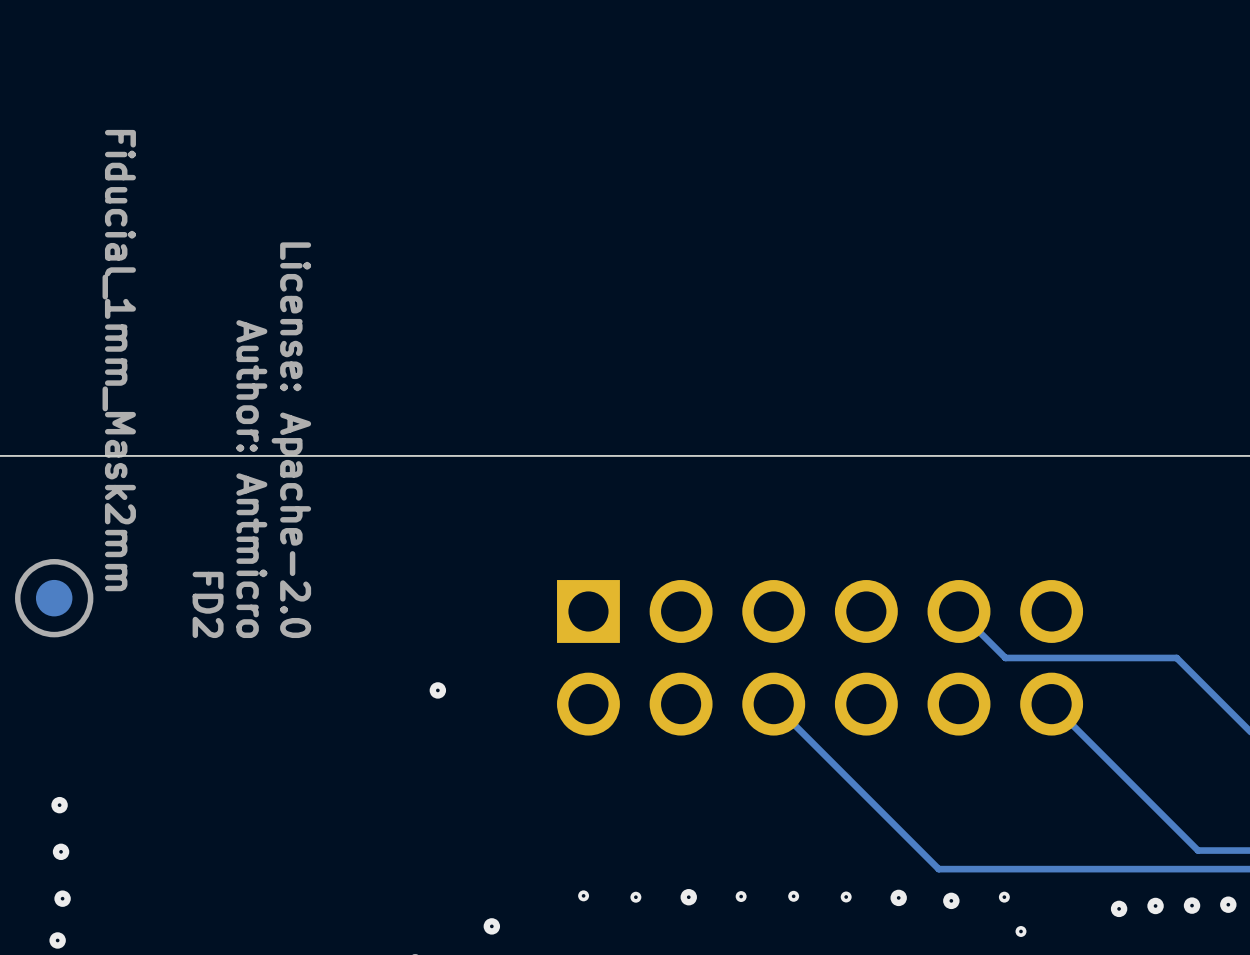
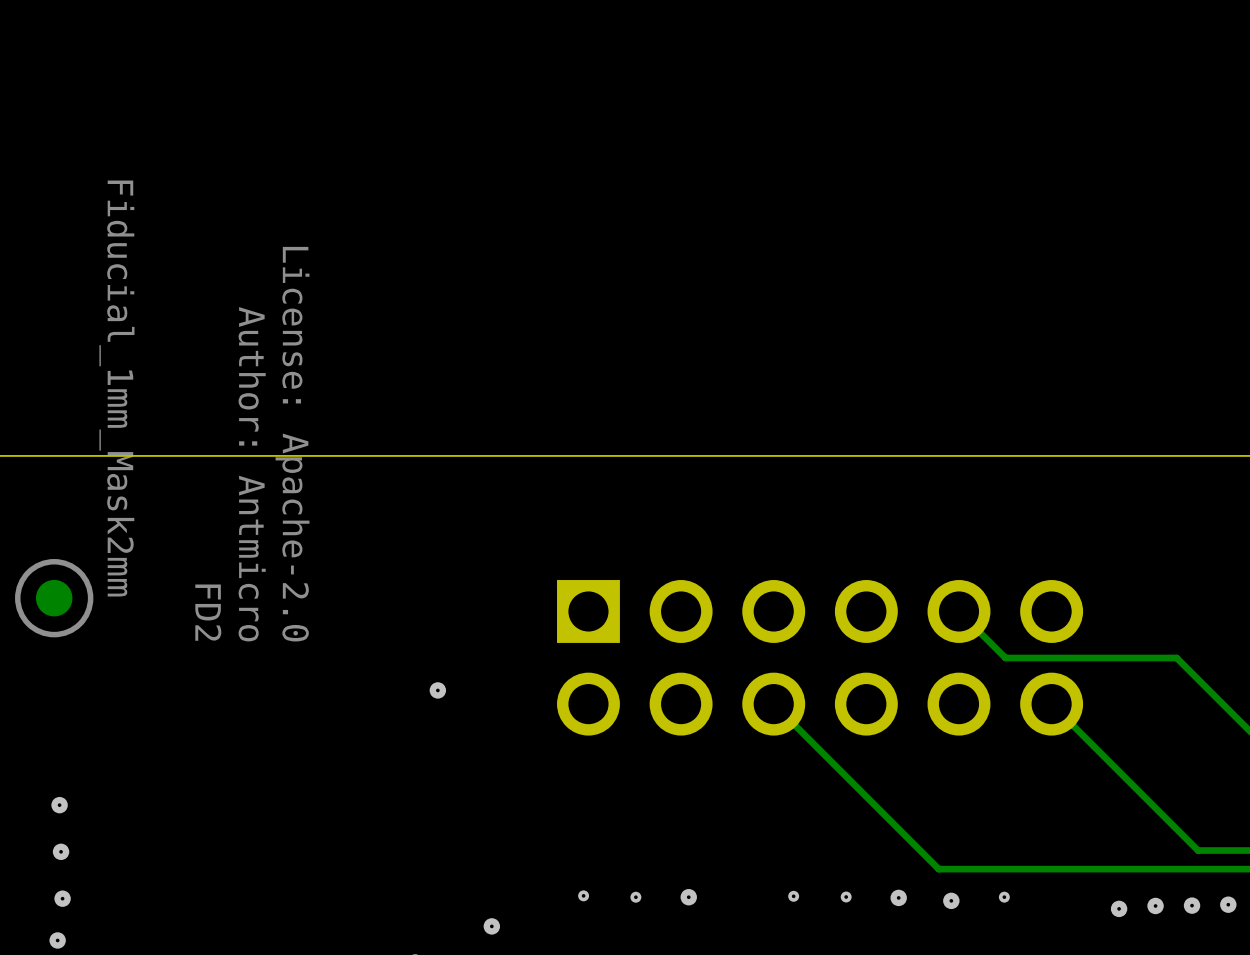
via: (741, 896) -> none
via: (1020, 931) -> none

